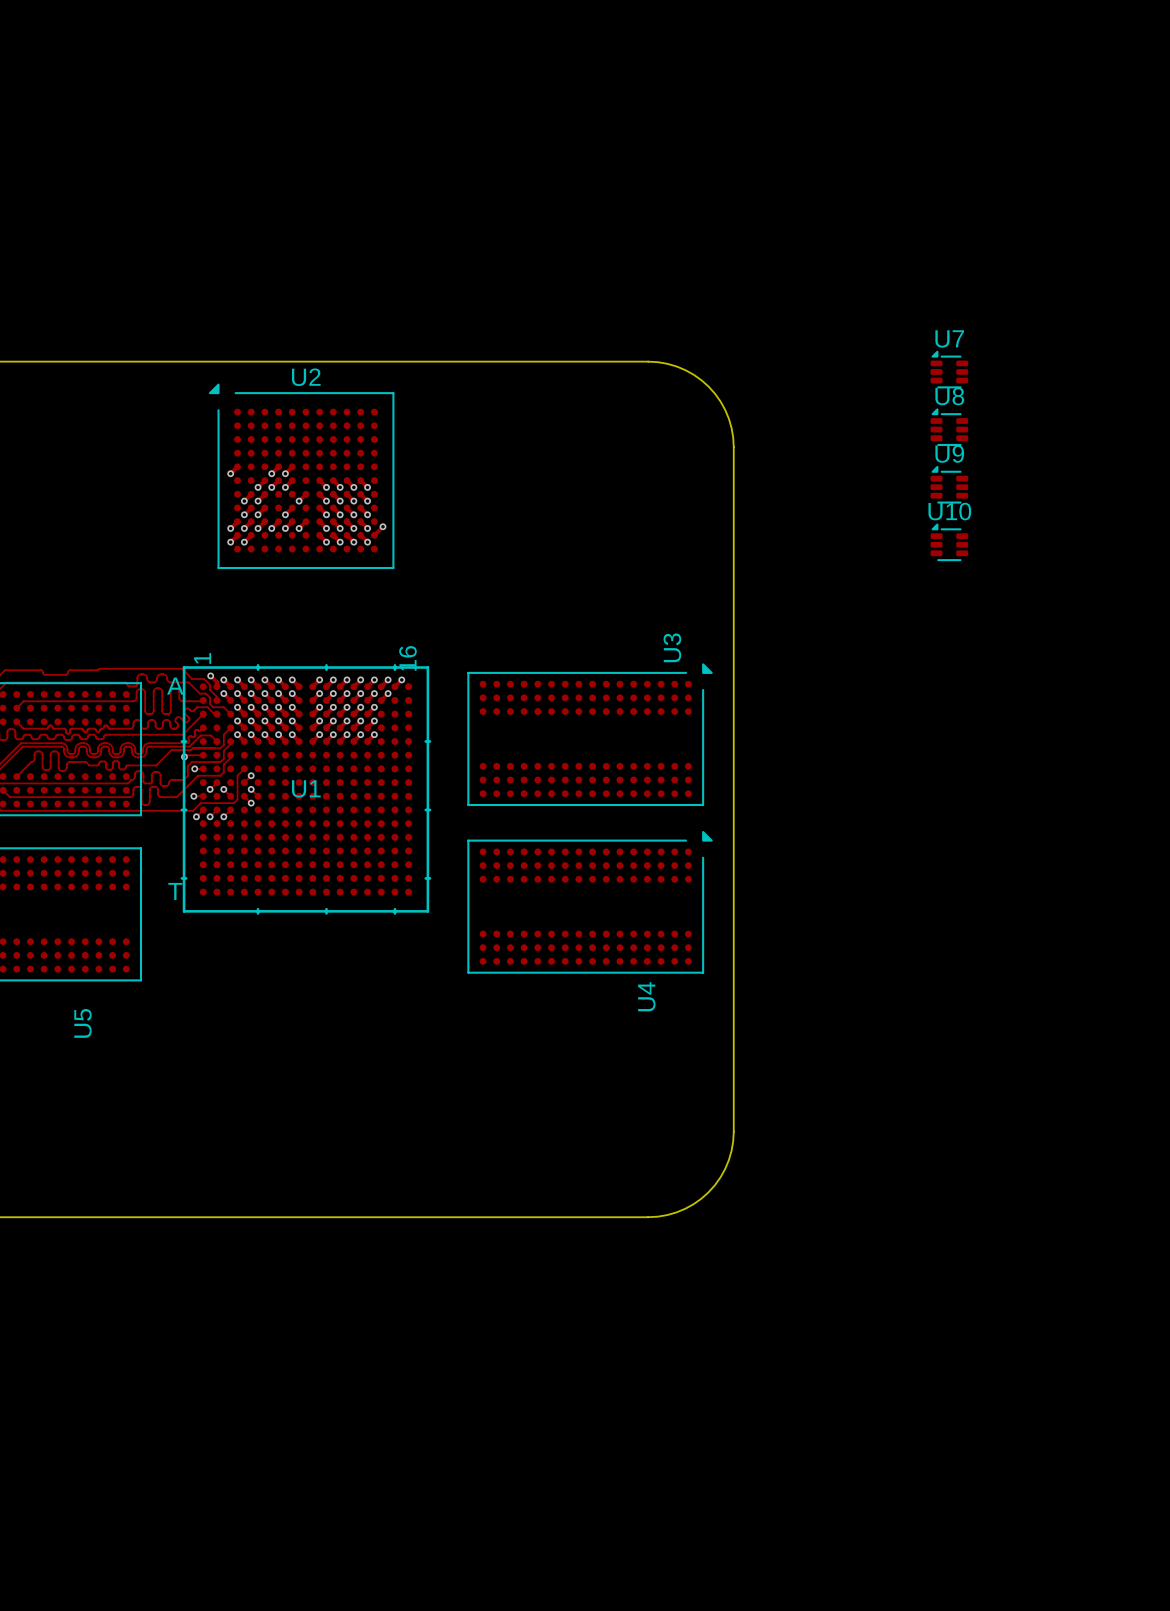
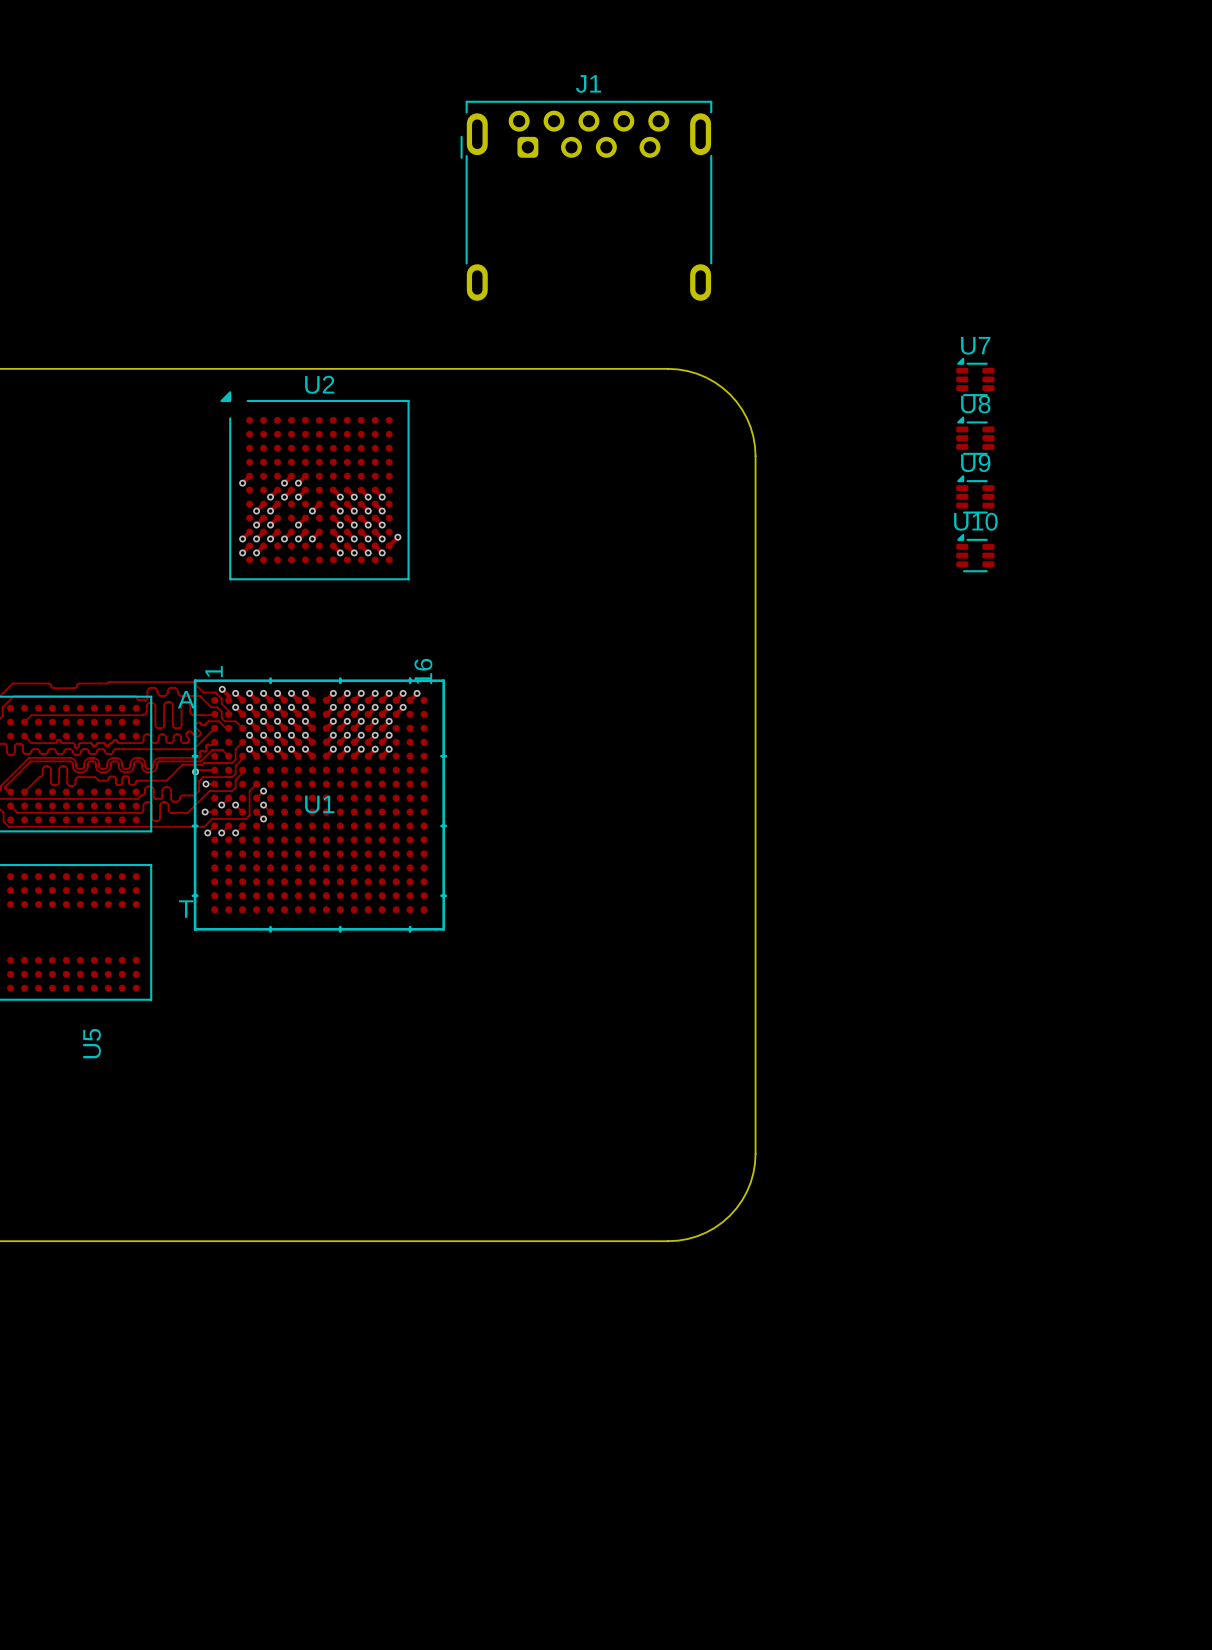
J1: none -> (586, 200)
U3: (590, 734) -> none
U4: (590, 902) -> none

